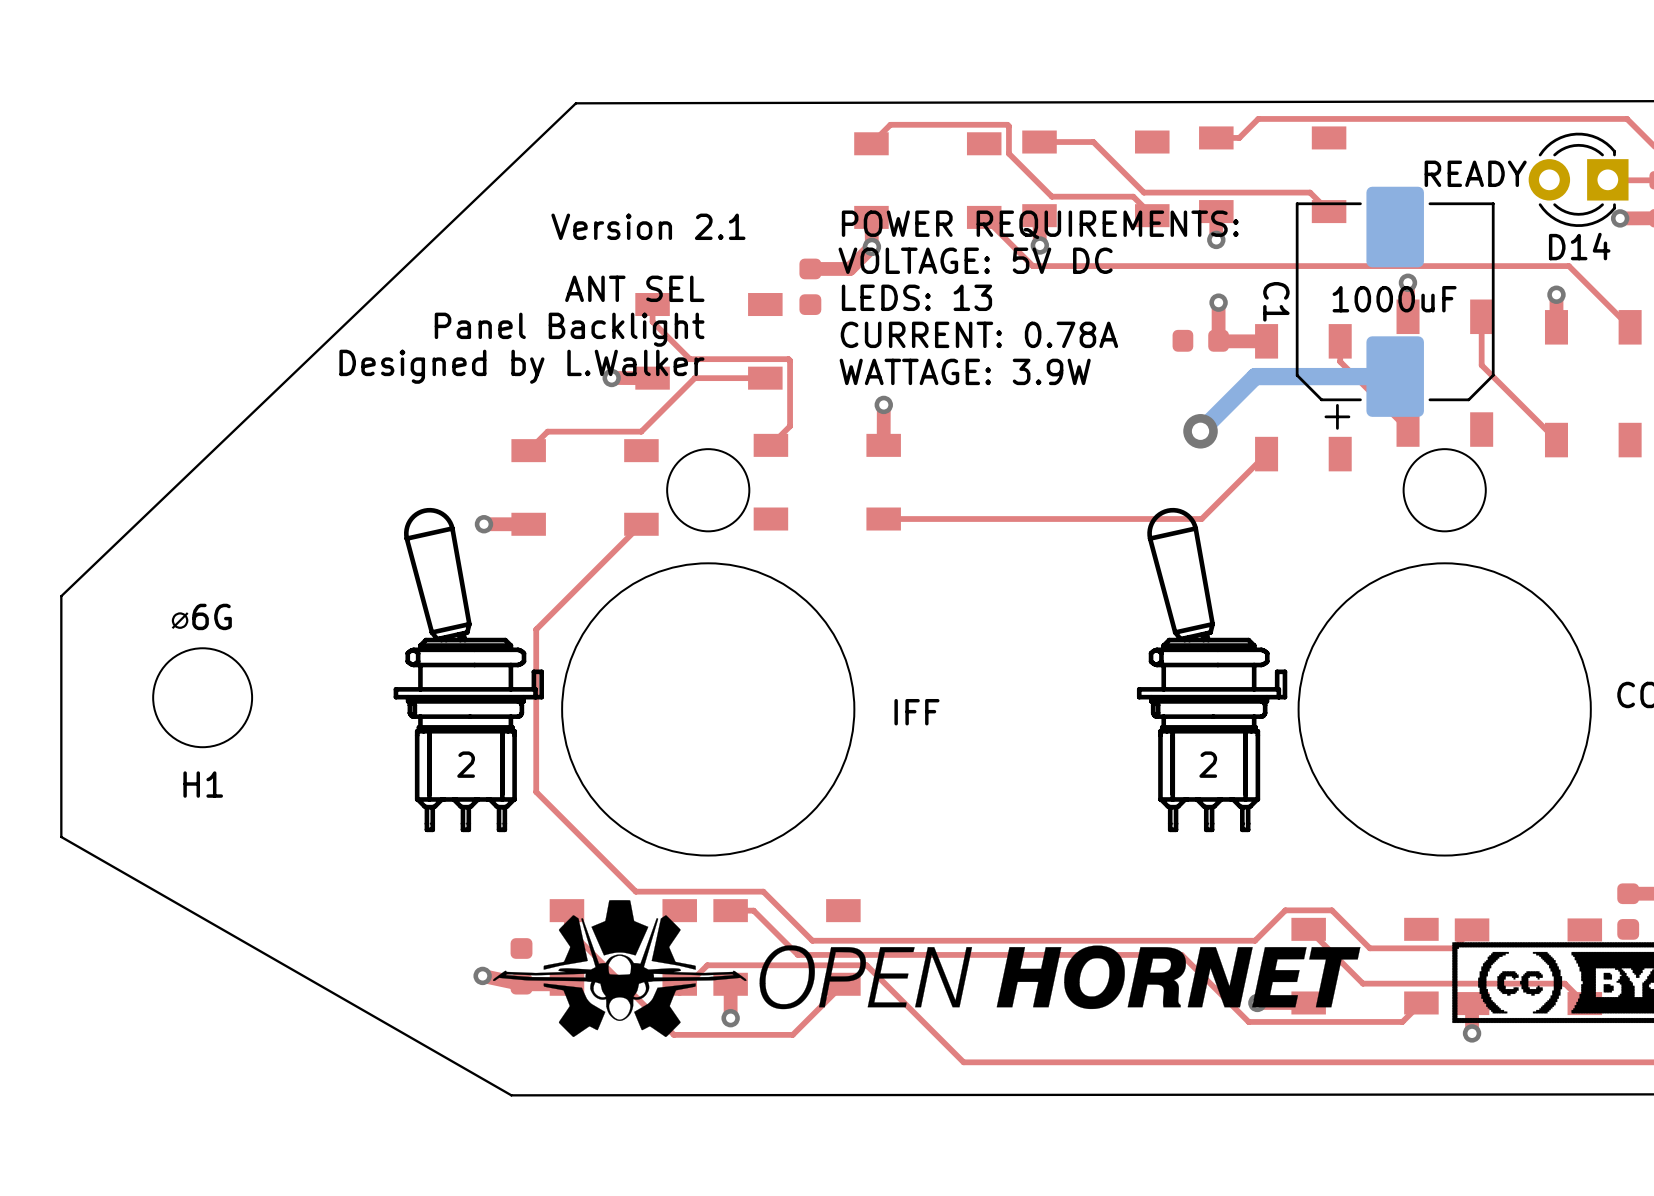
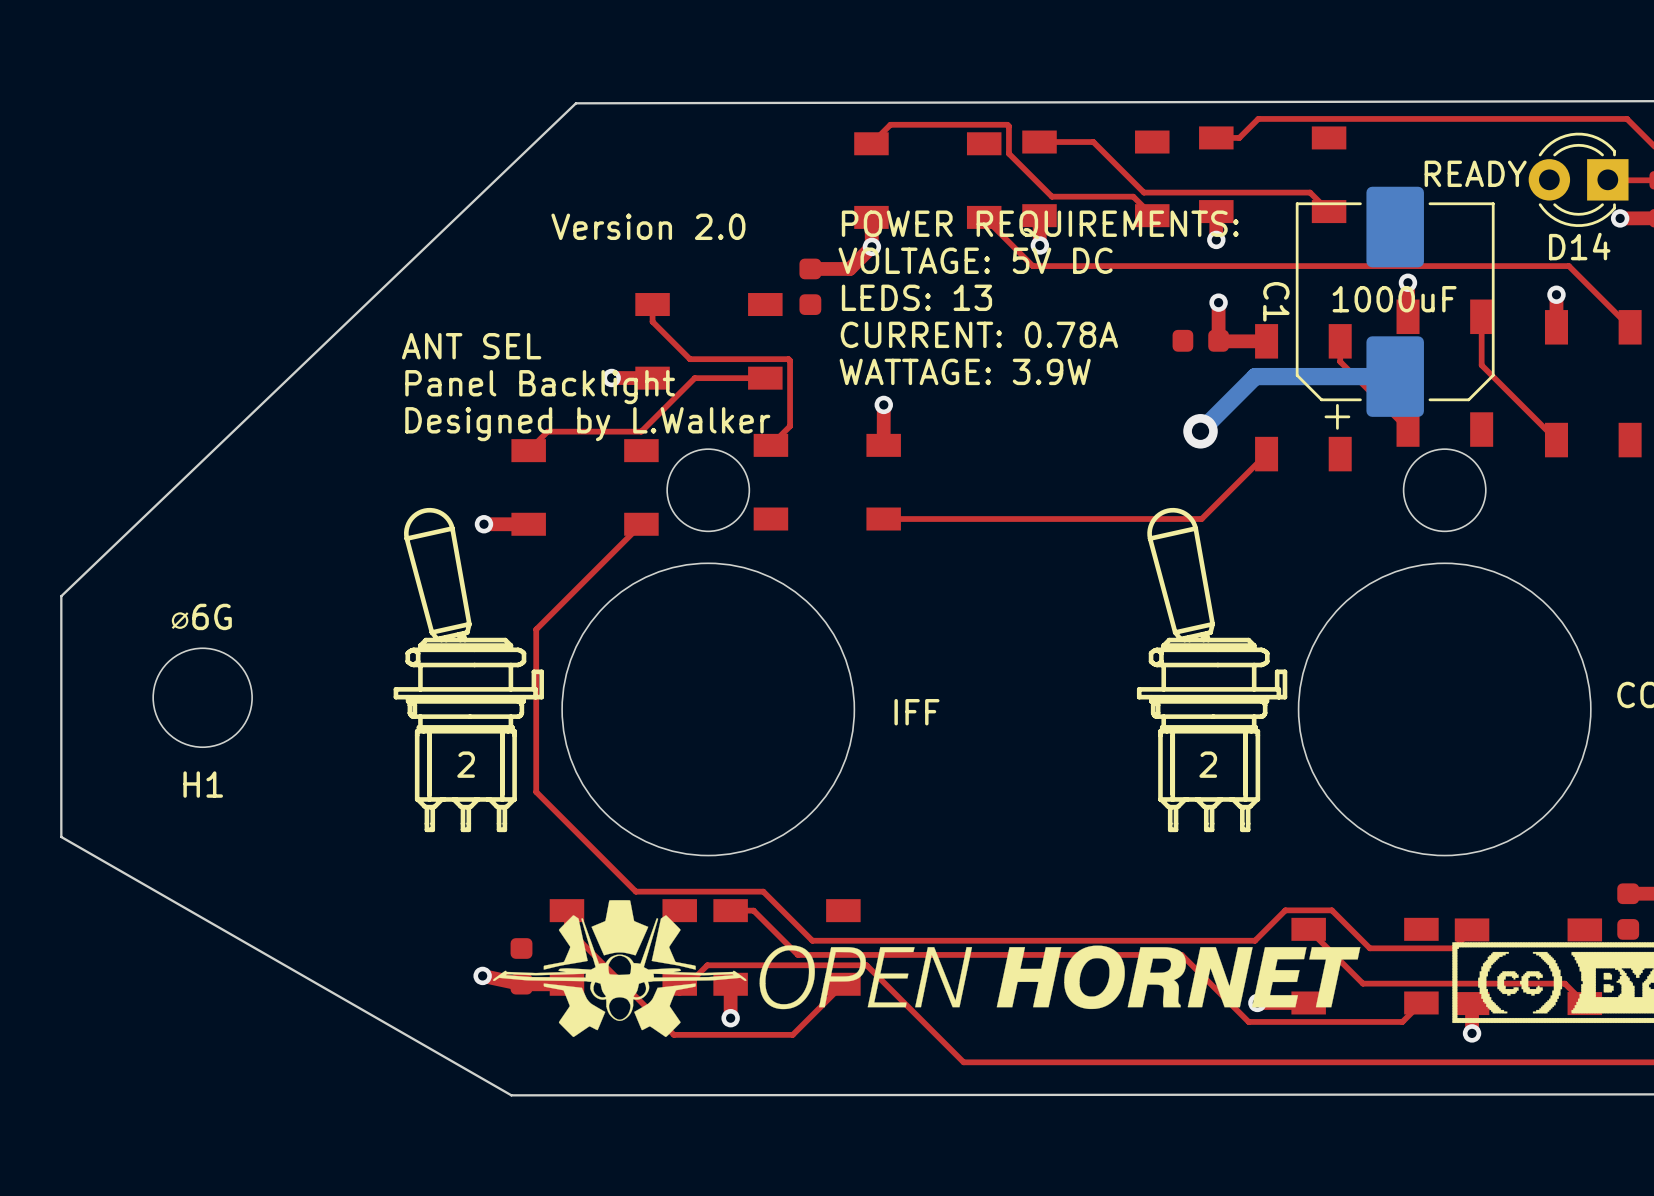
text: Version 2.1 (648, 226) -> Version 2.0 (648, 226)
text position: ANT SEL (634, 288) -> ANT SEL (471, 346)
text position: Panel Backlight (569, 329) -> Panel Backlight (540, 387)
text position: Designed by L.Walker (521, 366) -> Designed by L.Walker (587, 424)

